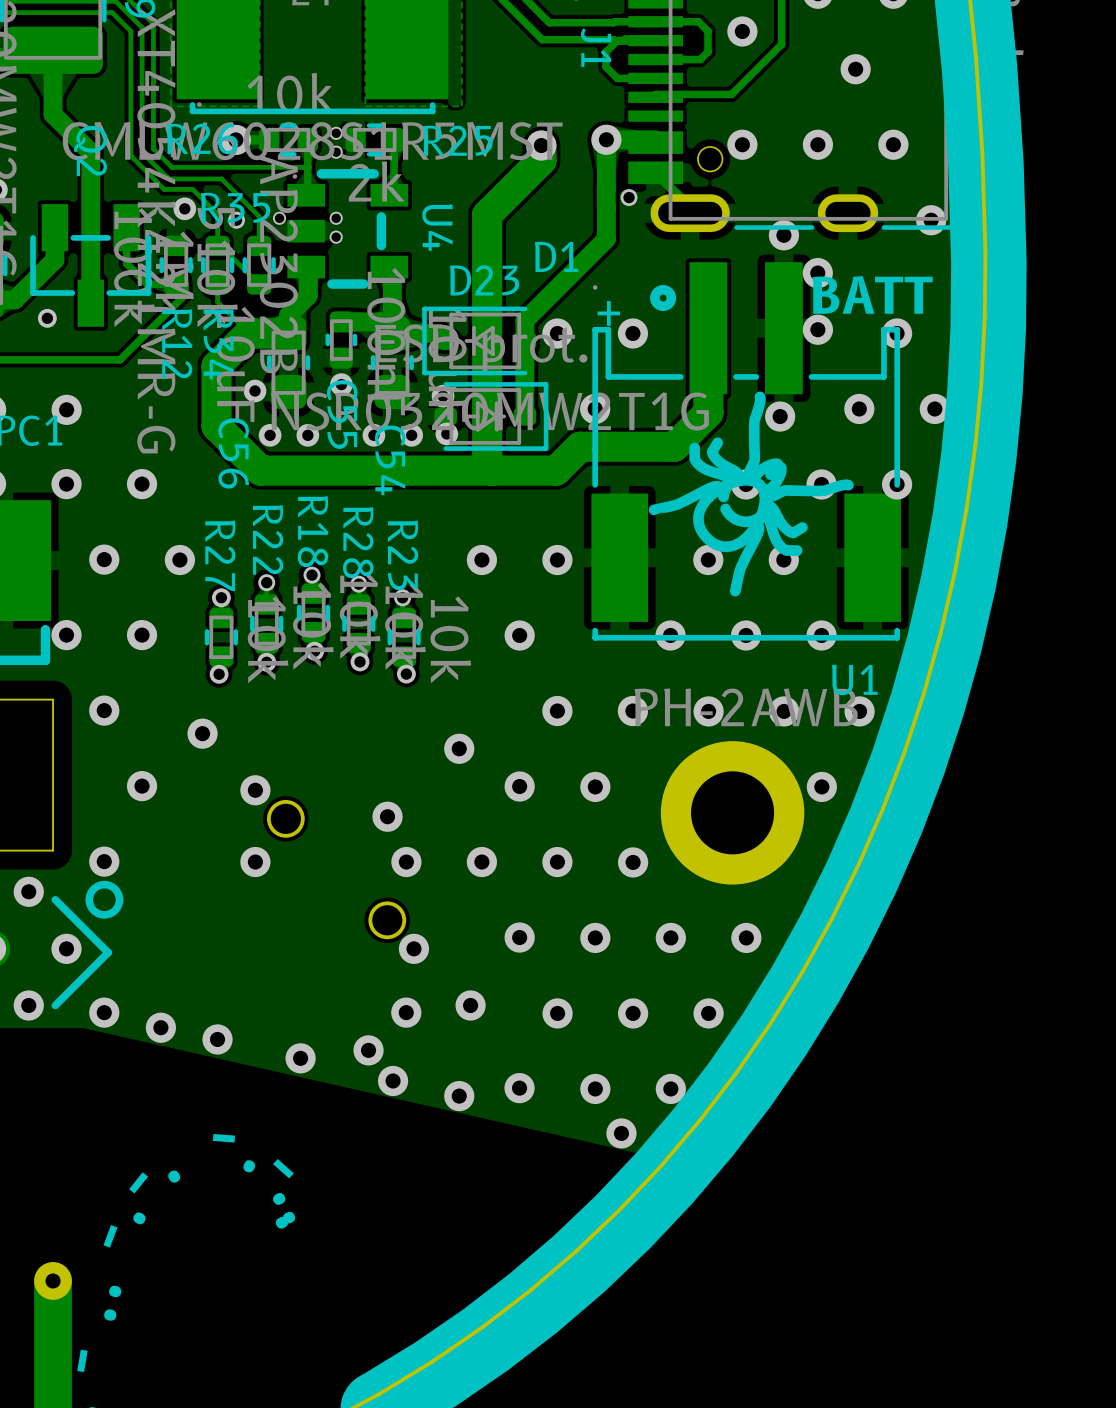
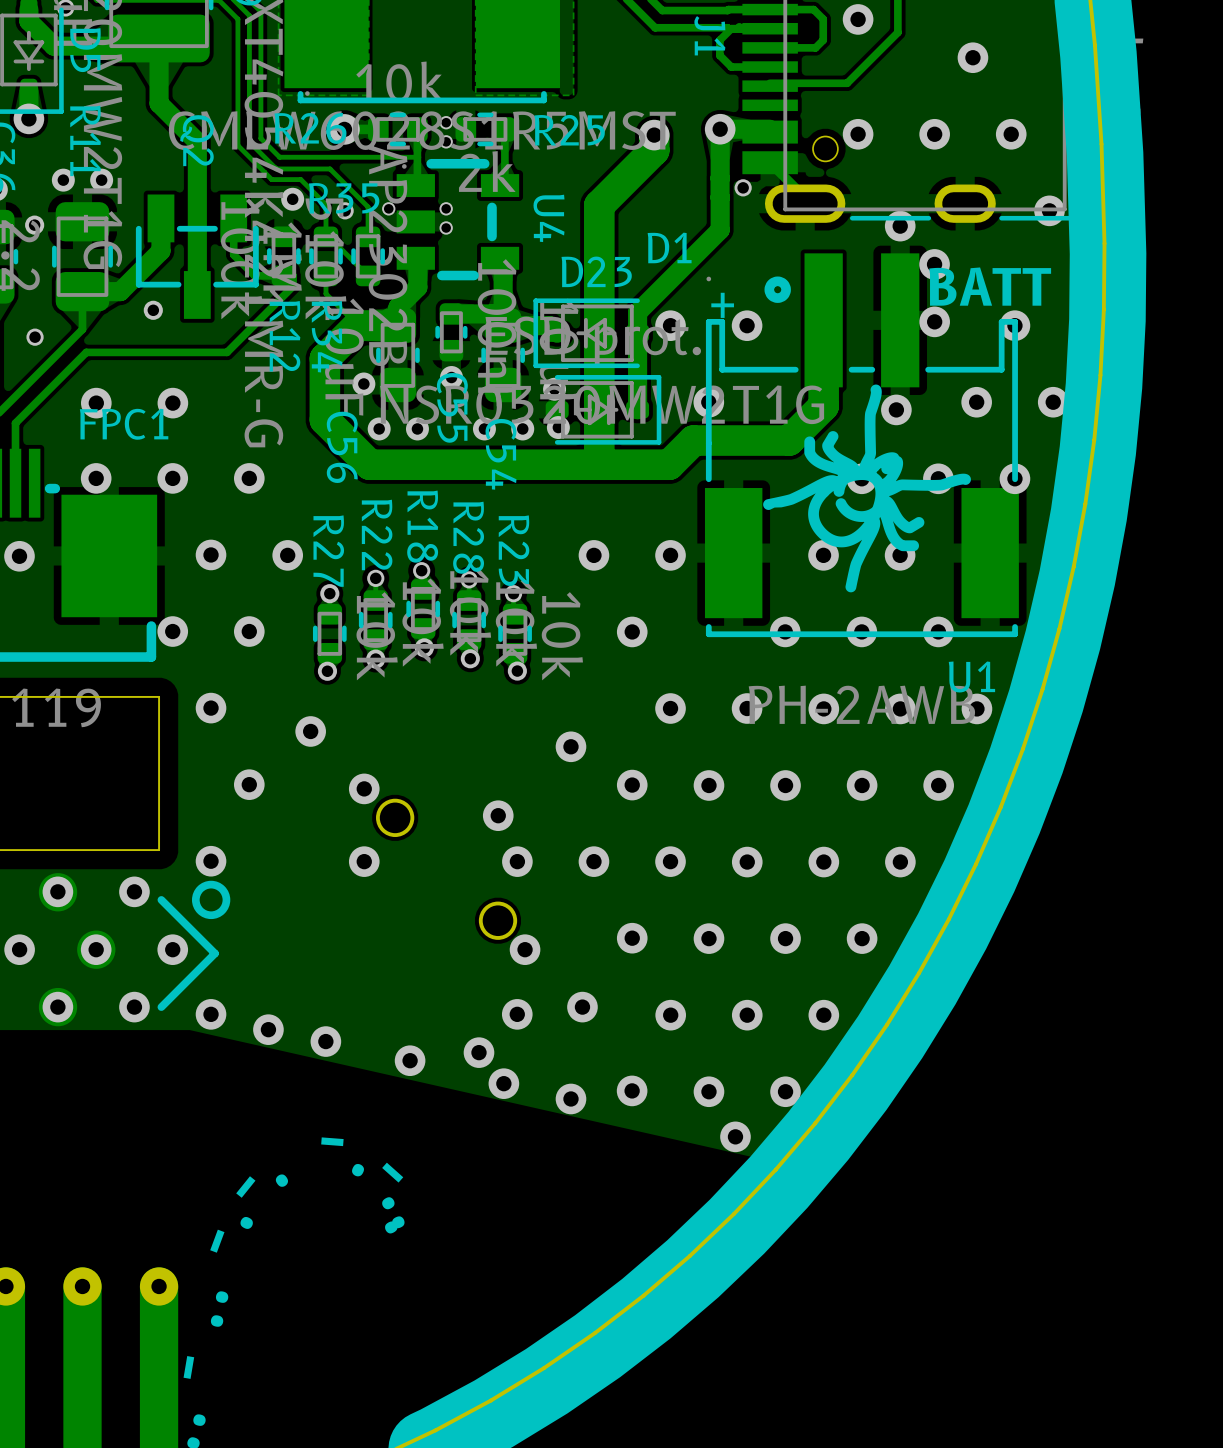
via: none -> (785, 785)
via: none -> (862, 785)
part: (732, 812) -> none
via: none -> (823, 862)
via: none -> (900, 862)

